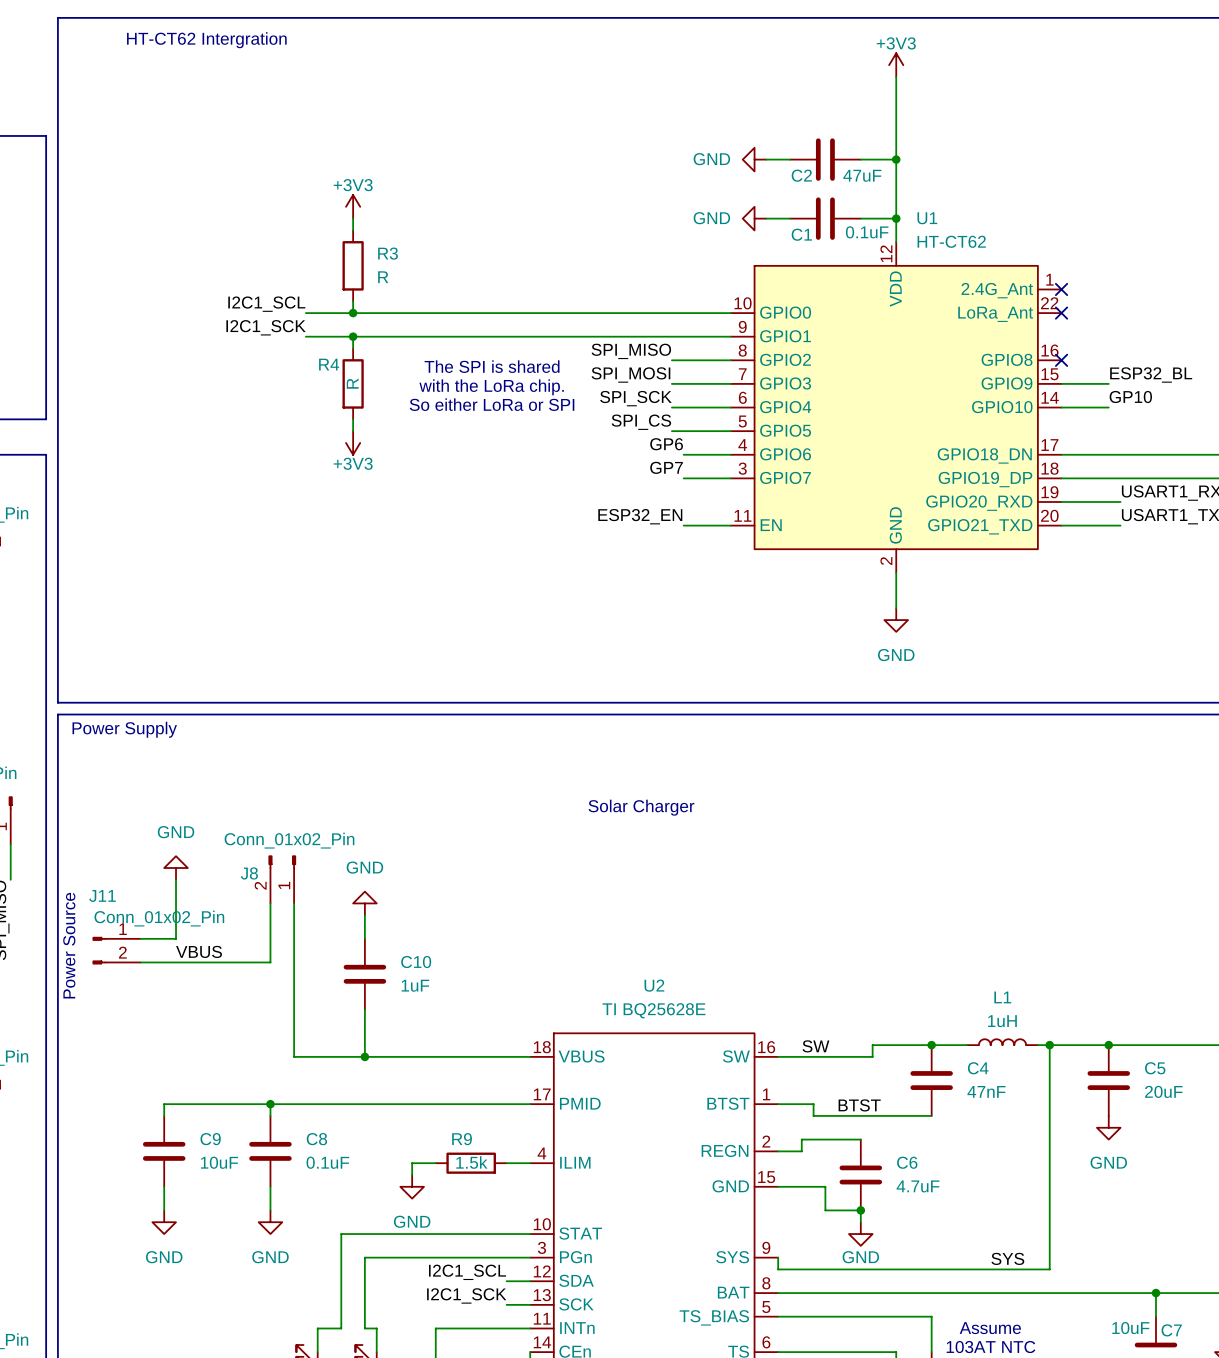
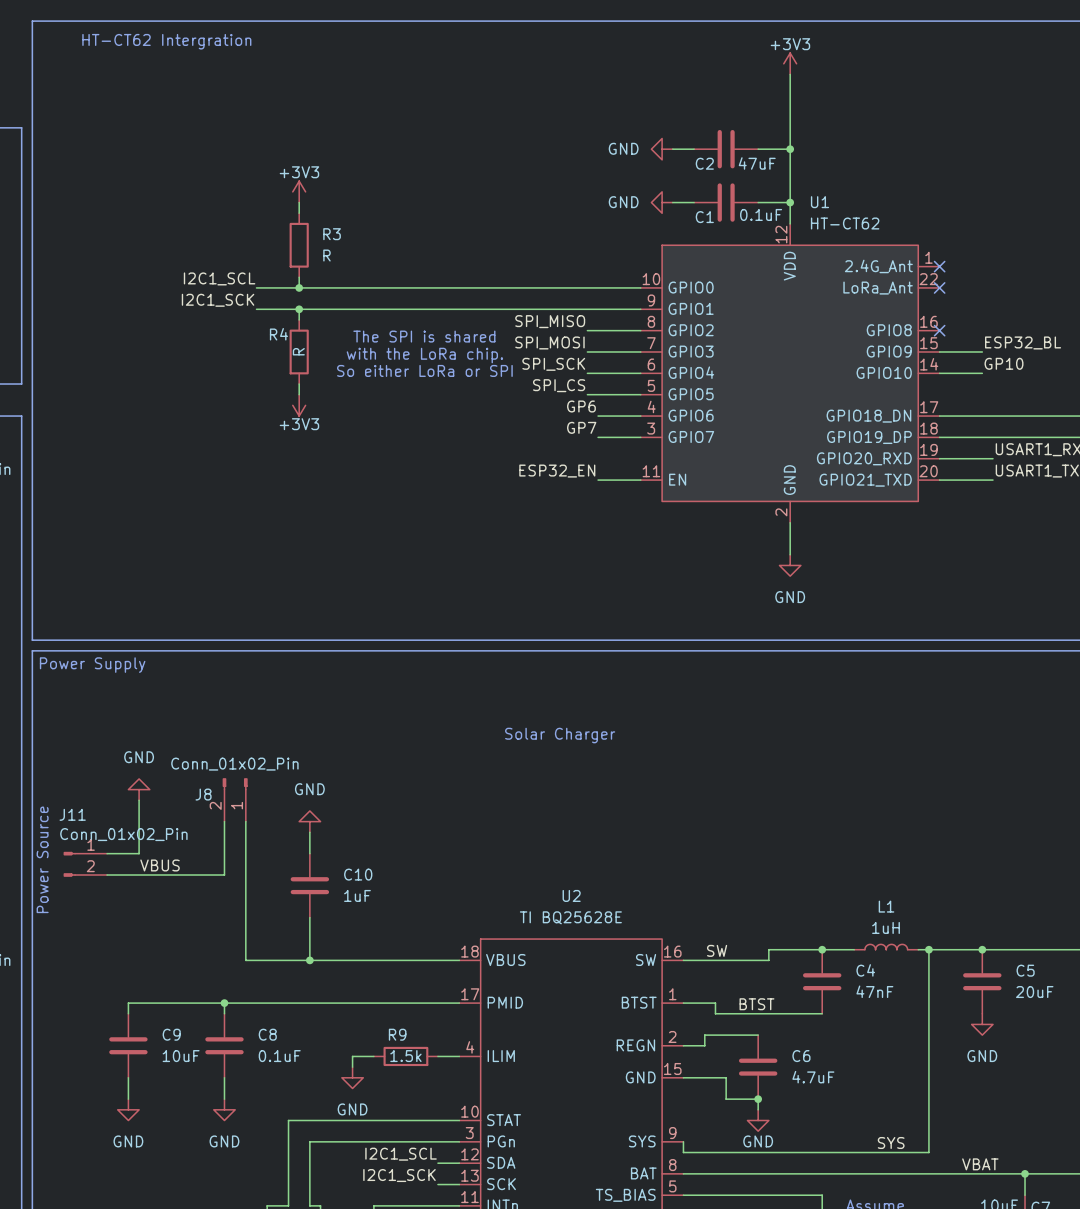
label: none -> VBAT (980, 1164)

